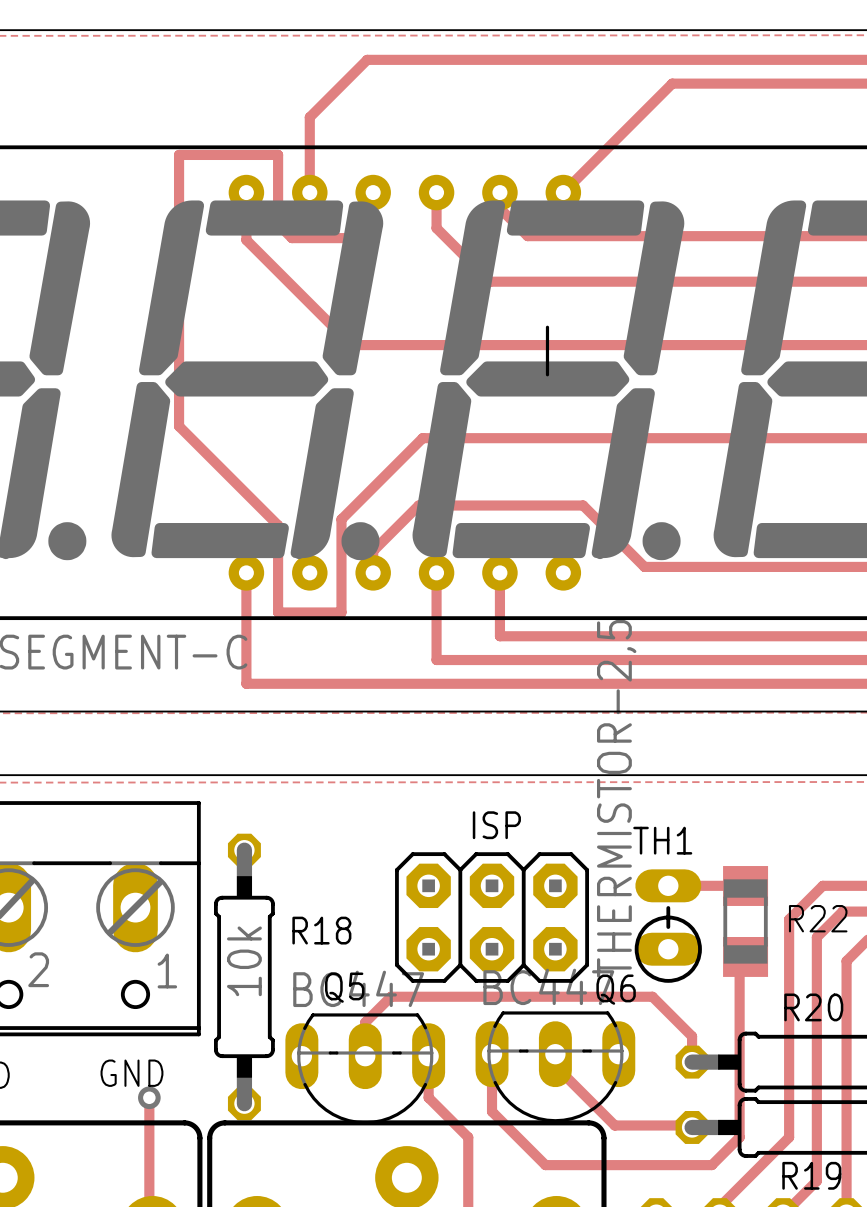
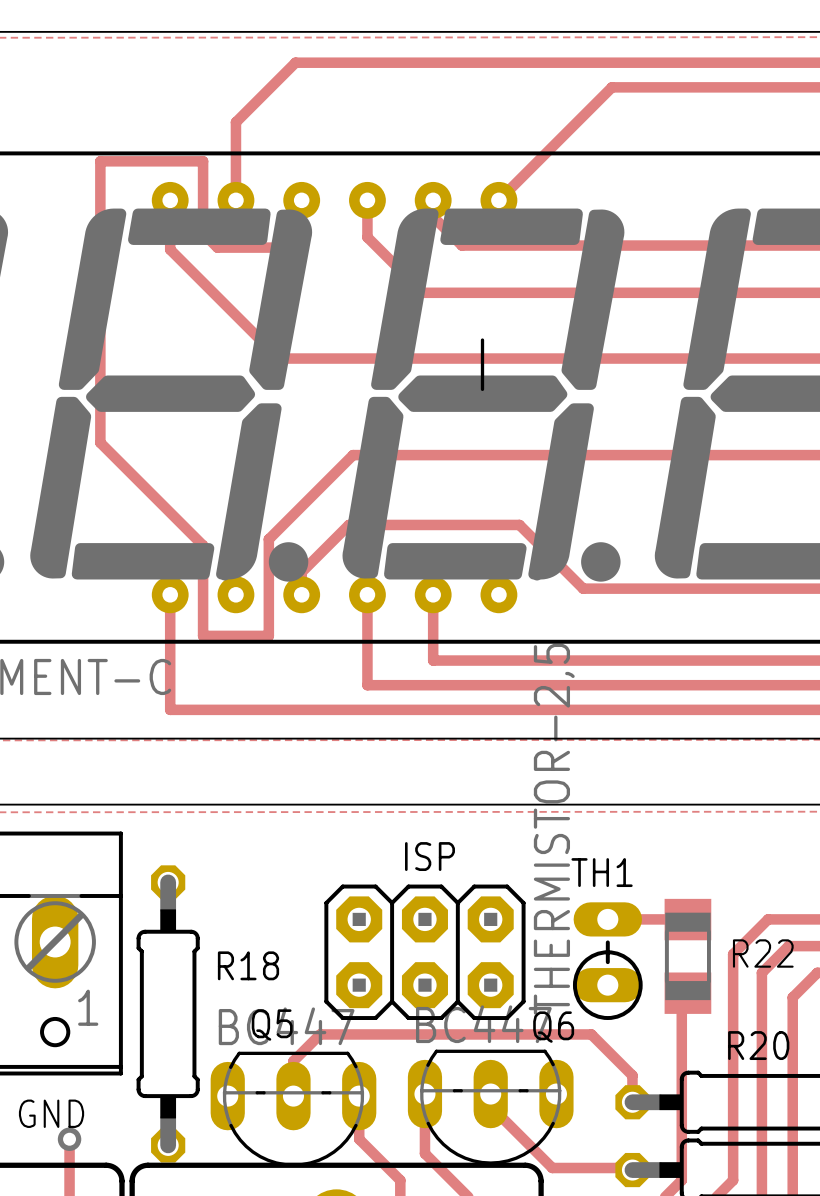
R18 value: 10k (244, 961) -> none

